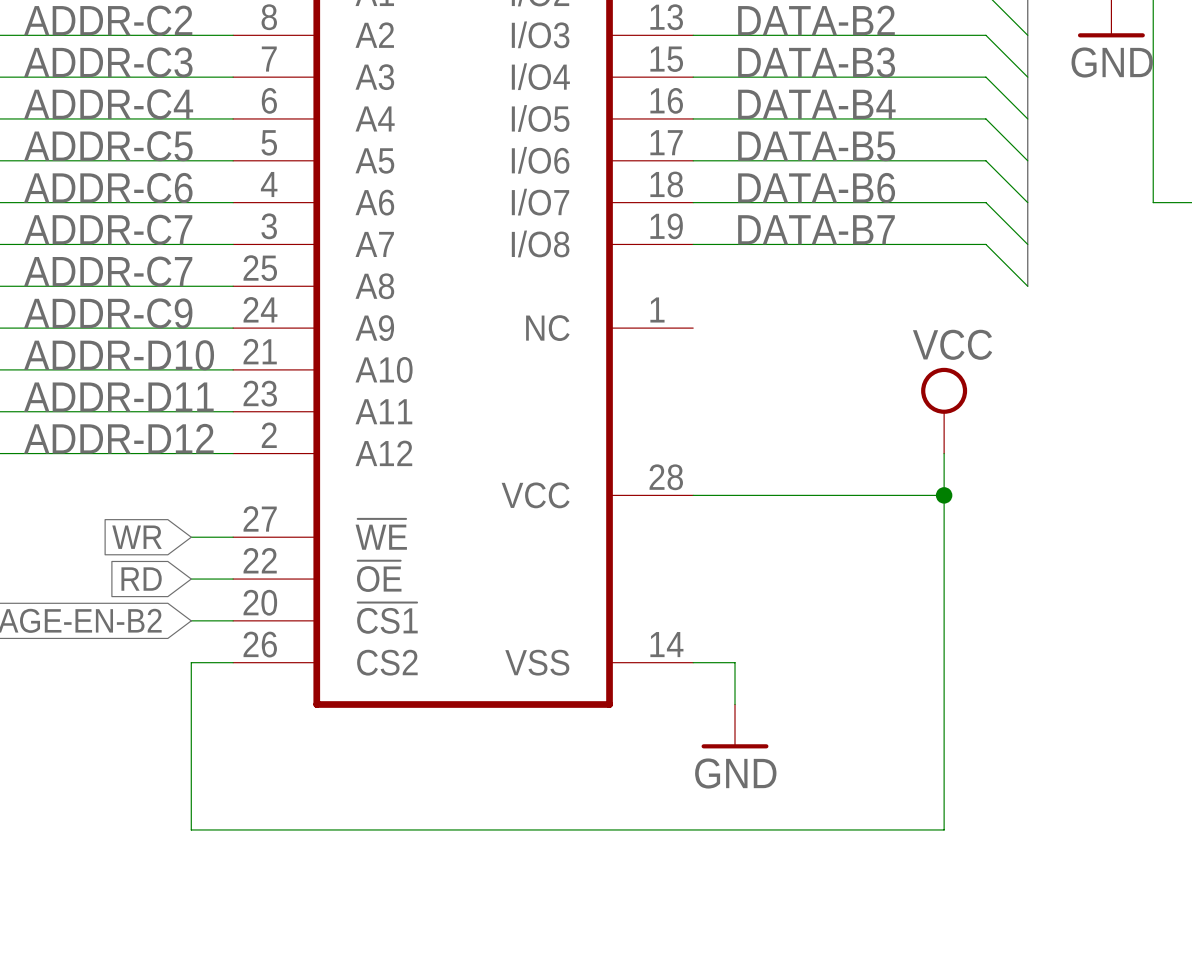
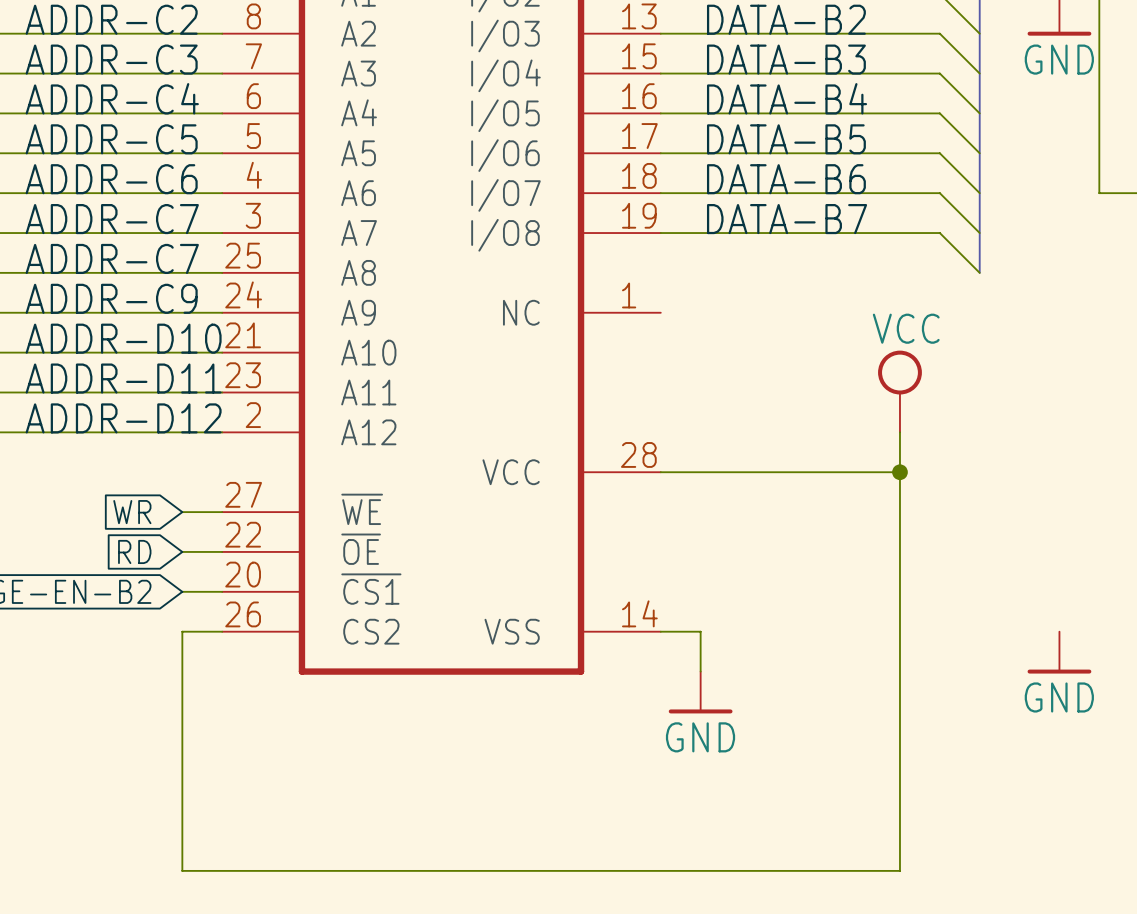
power symbol: none -> GND (1059, 652)
wire: (191, 829) (944, 829) -> (182, 791) (182, 870) (899, 870) (899, 791)

